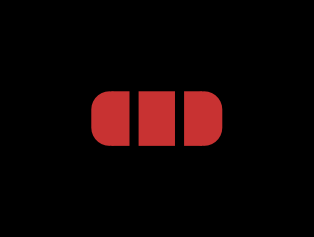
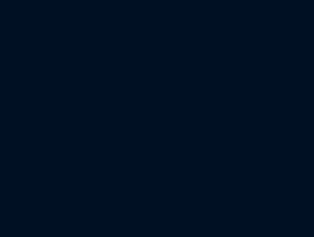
part: (156, 118) -> none

